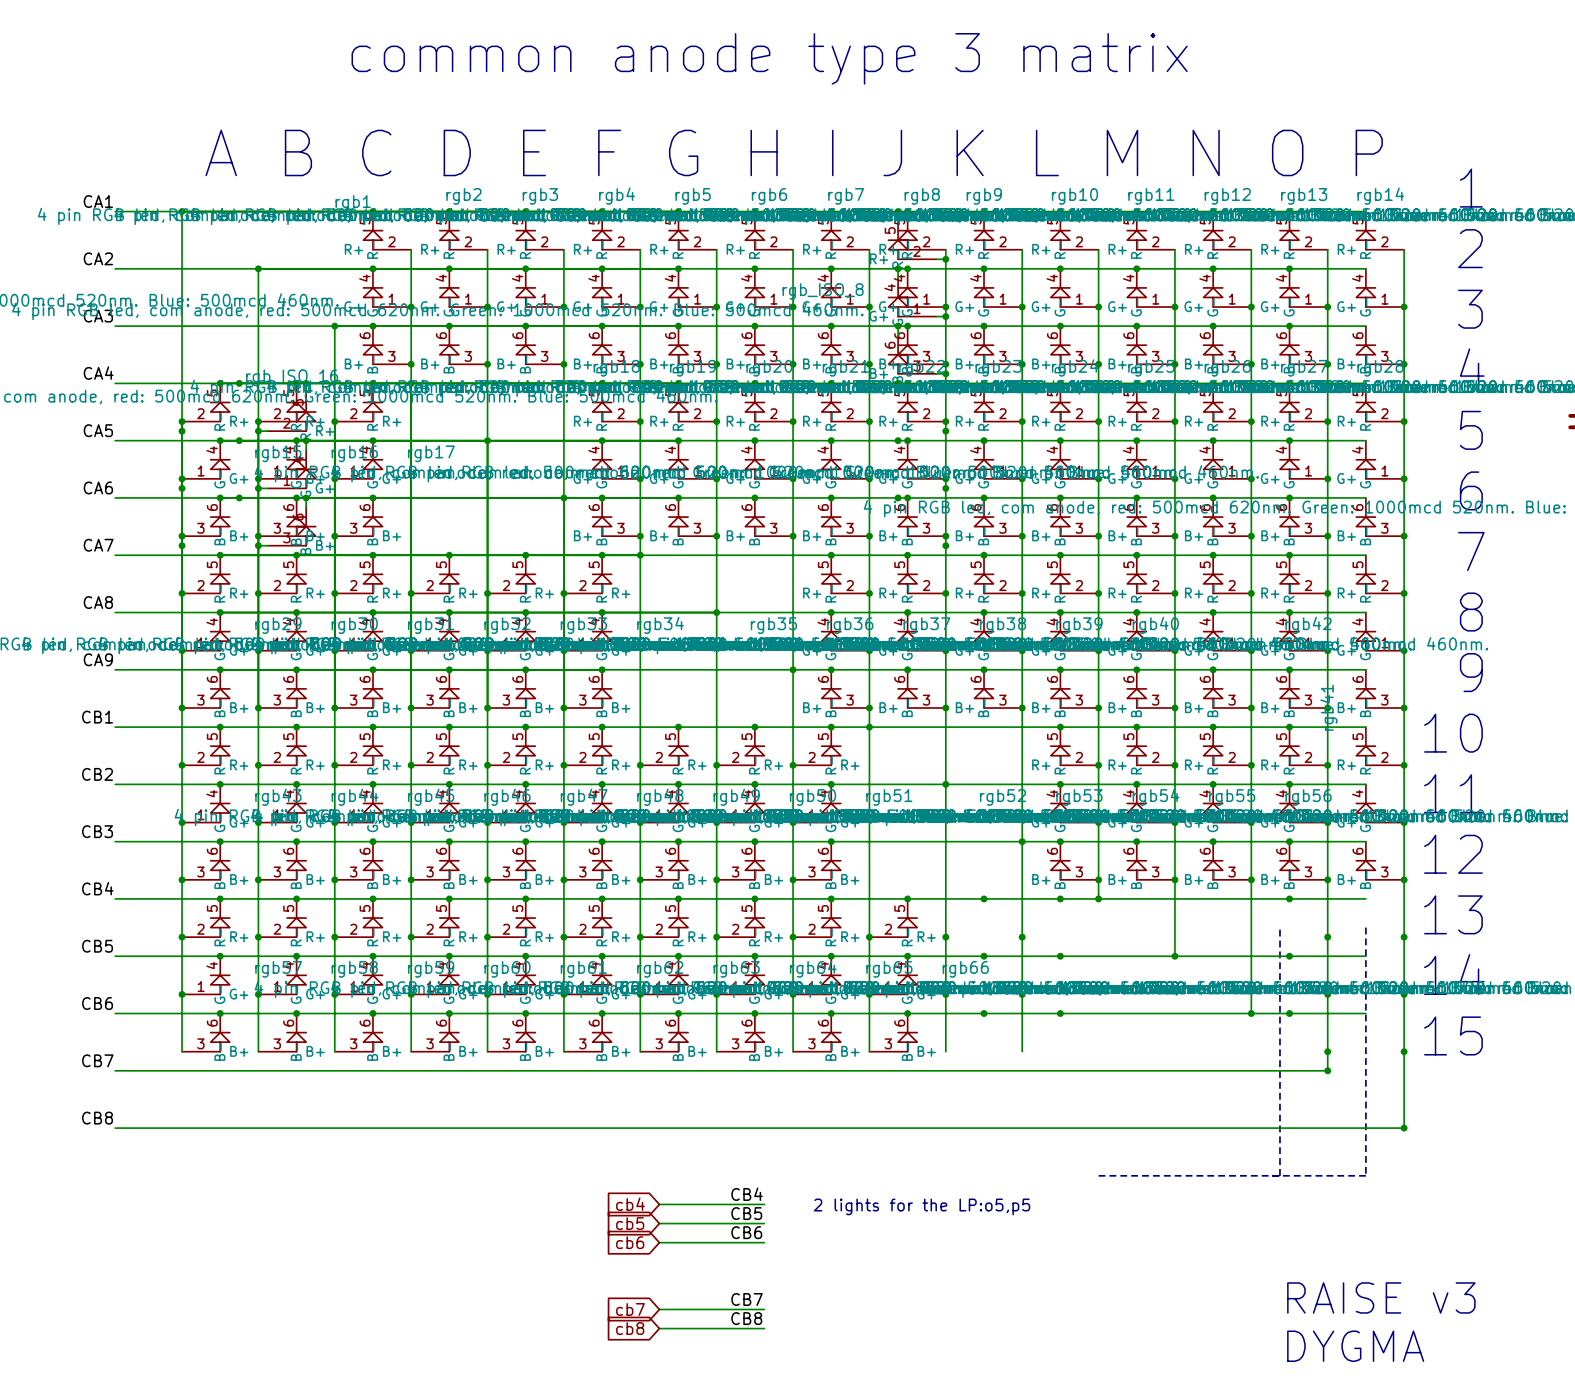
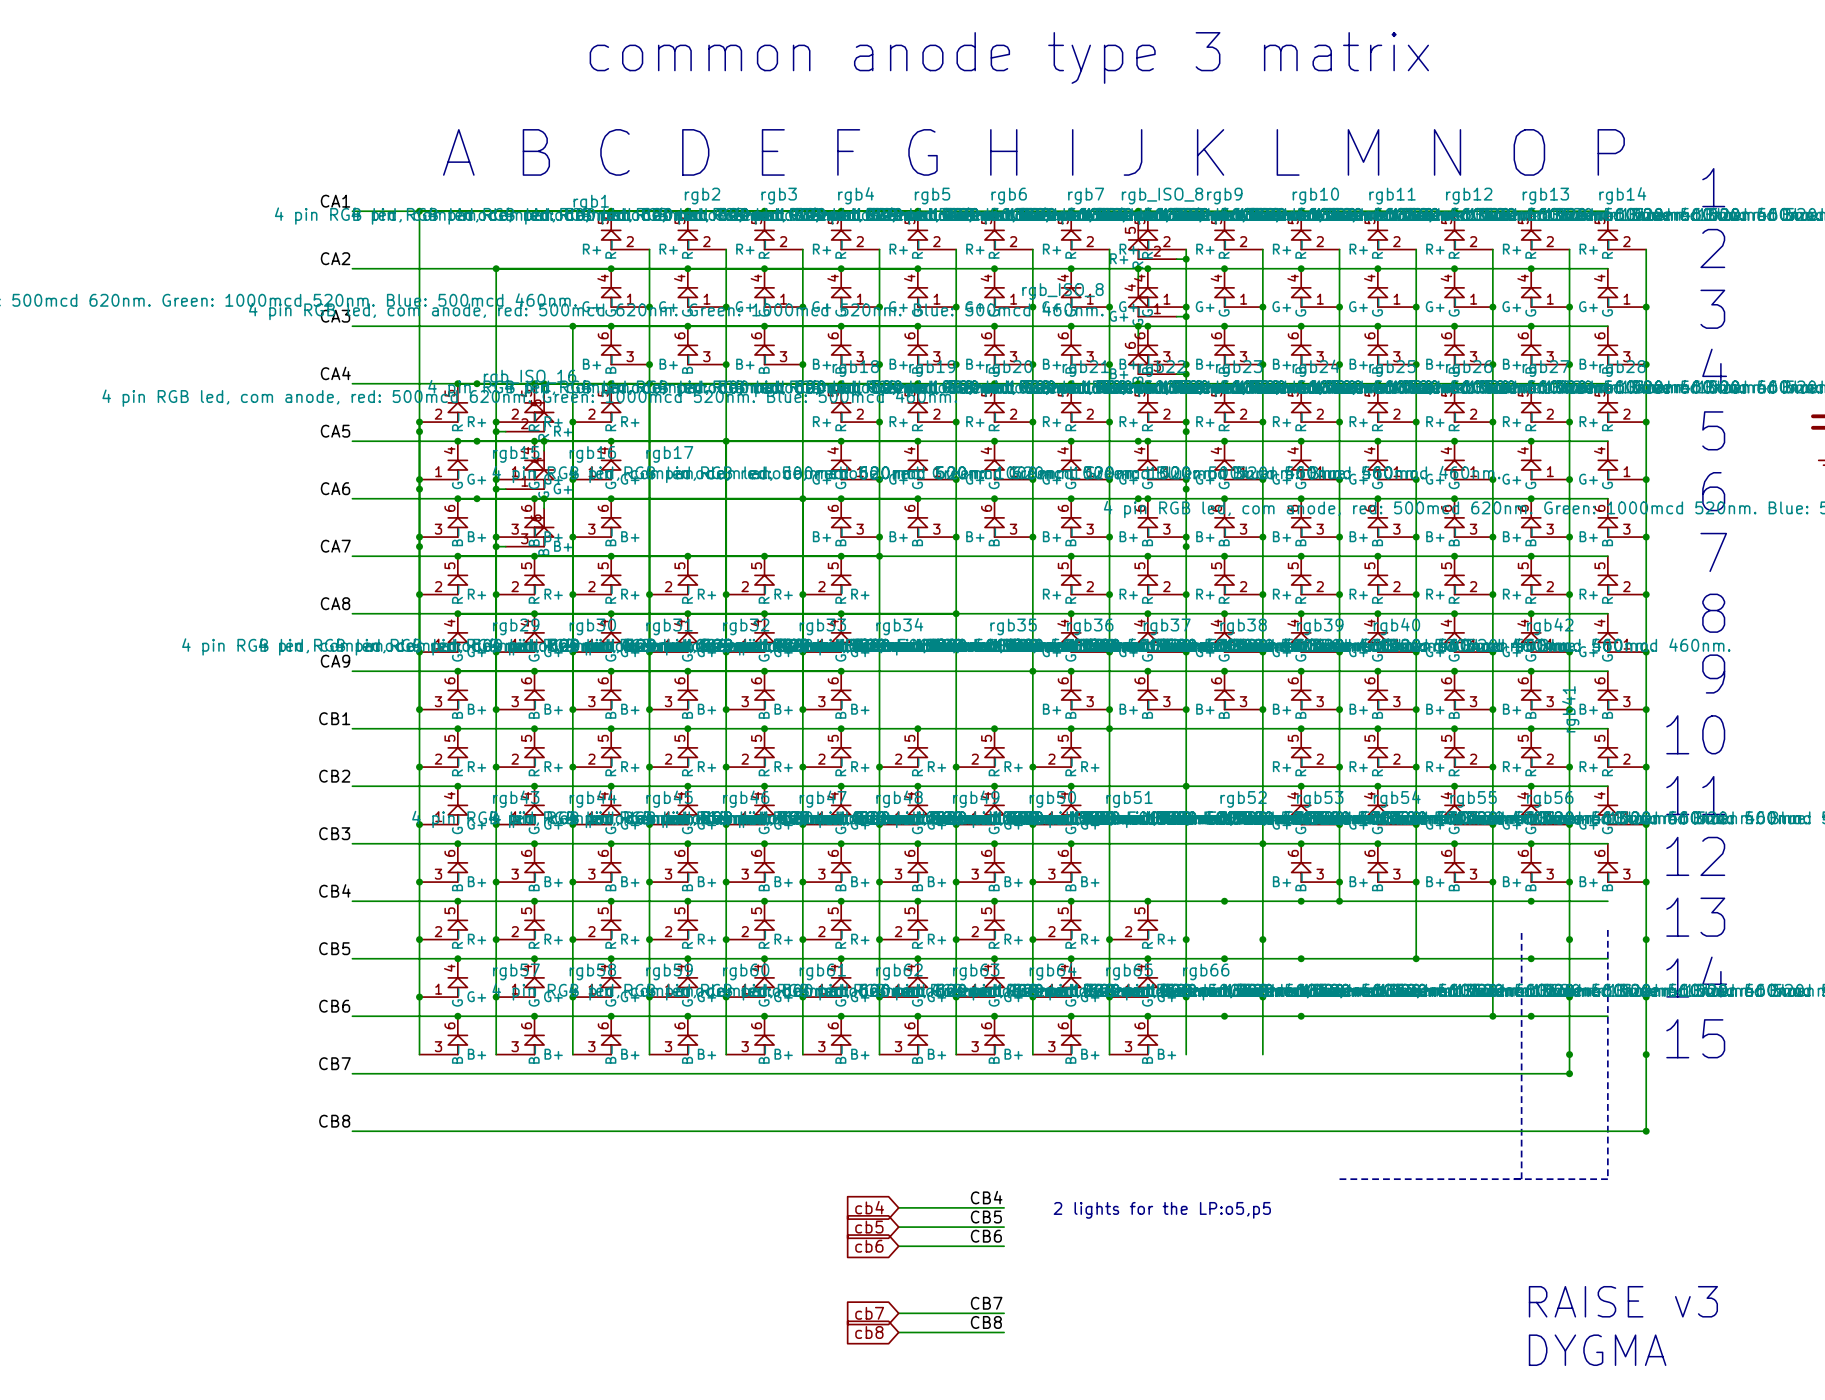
rgb8 name: rgb8 (922, 196) -> rgb_ISO_8 (1162, 196)

